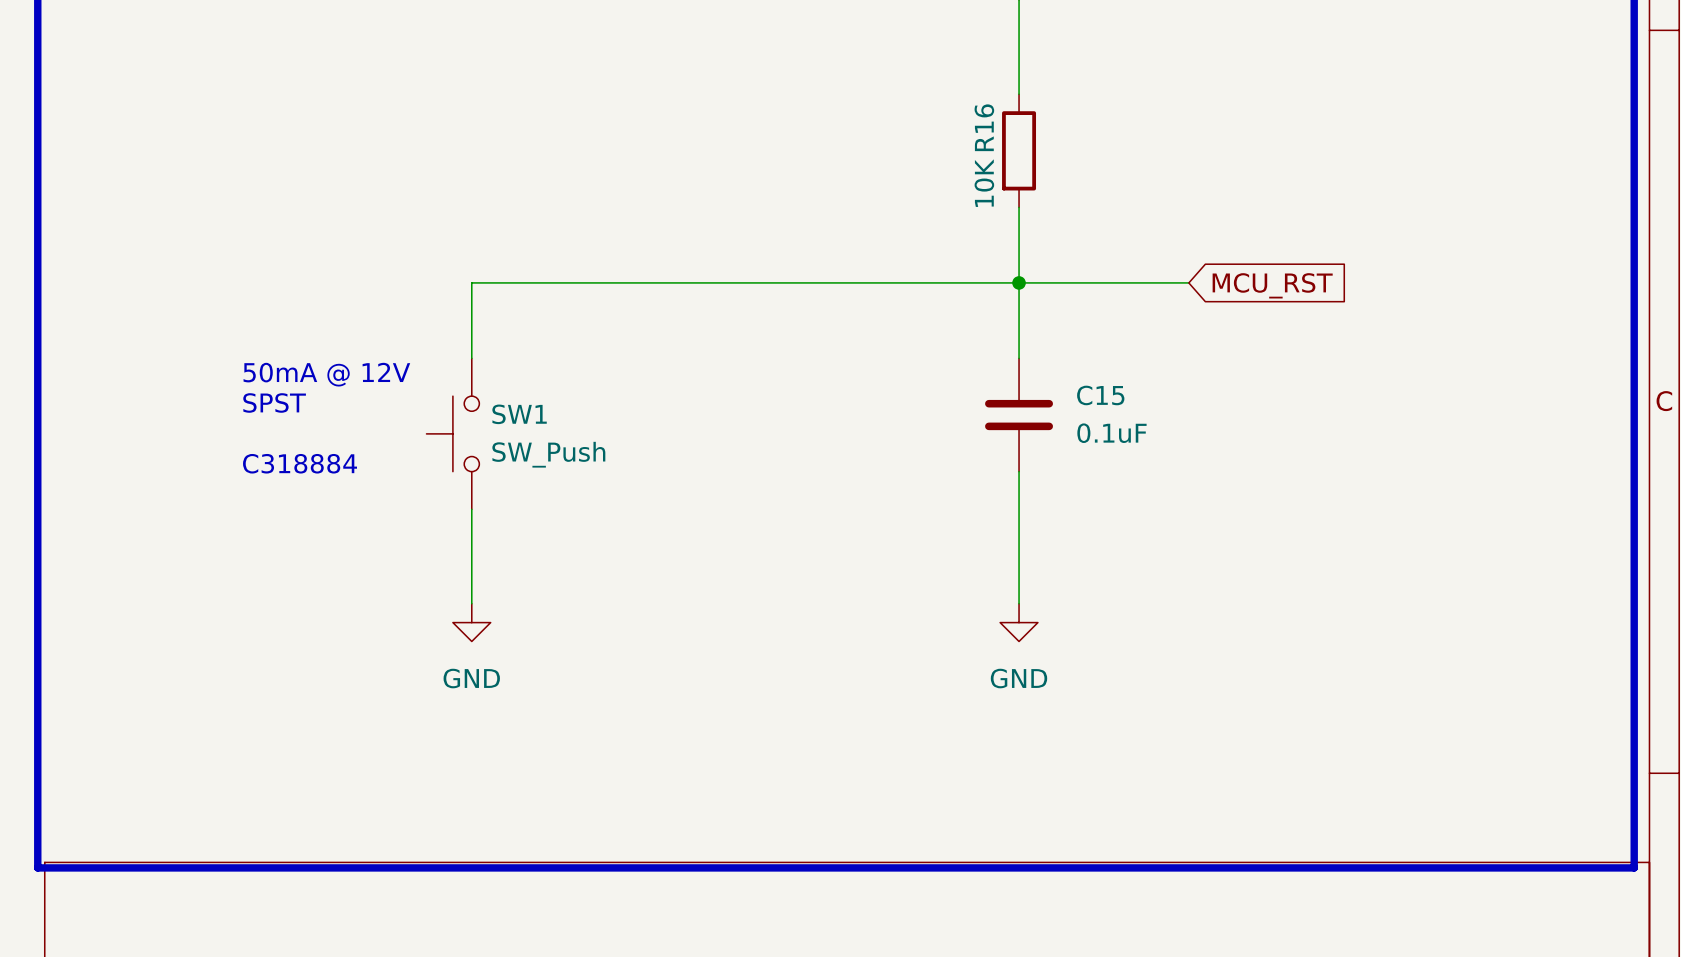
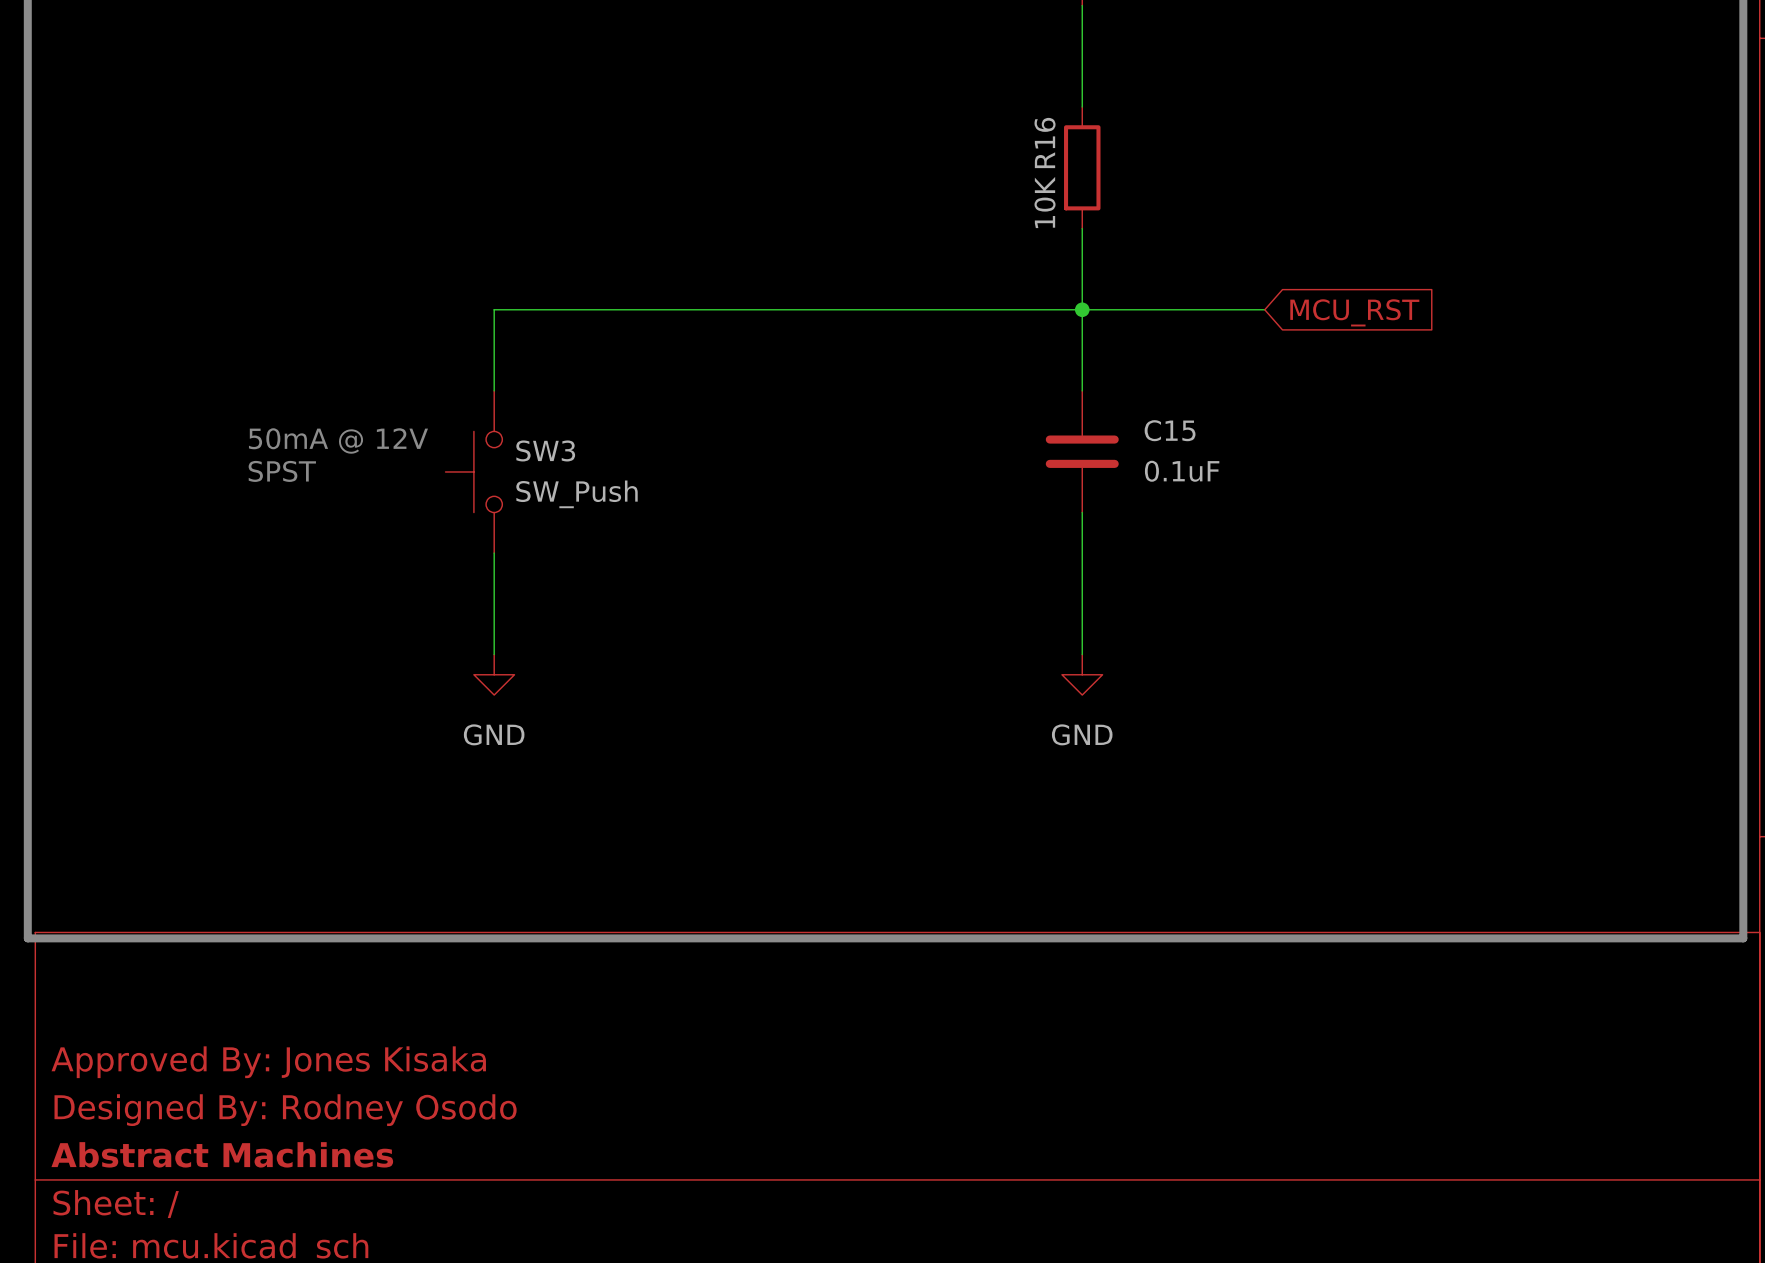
text: 50mA @ 12V (326, 374) -> none
text: SPST (274, 402) -> 50mA @ 12V (338, 440)
SW1 name: SW1 (519, 414) -> SW3 (545, 450)
text: none -> SPST (282, 471)
text: C318884 (300, 463) -> none

